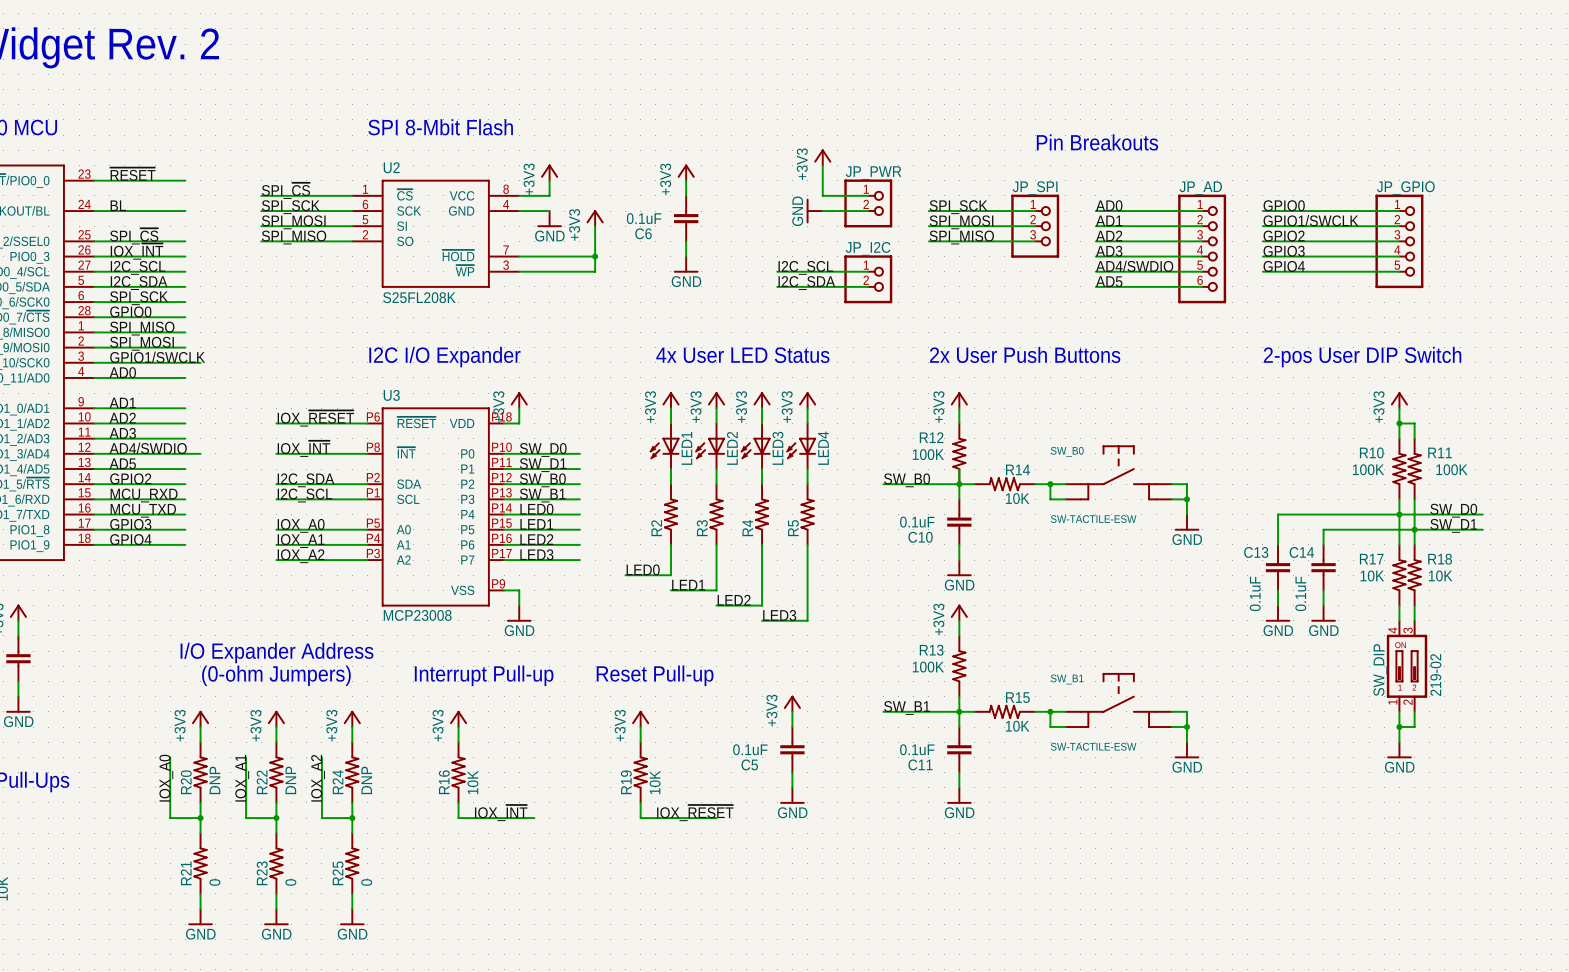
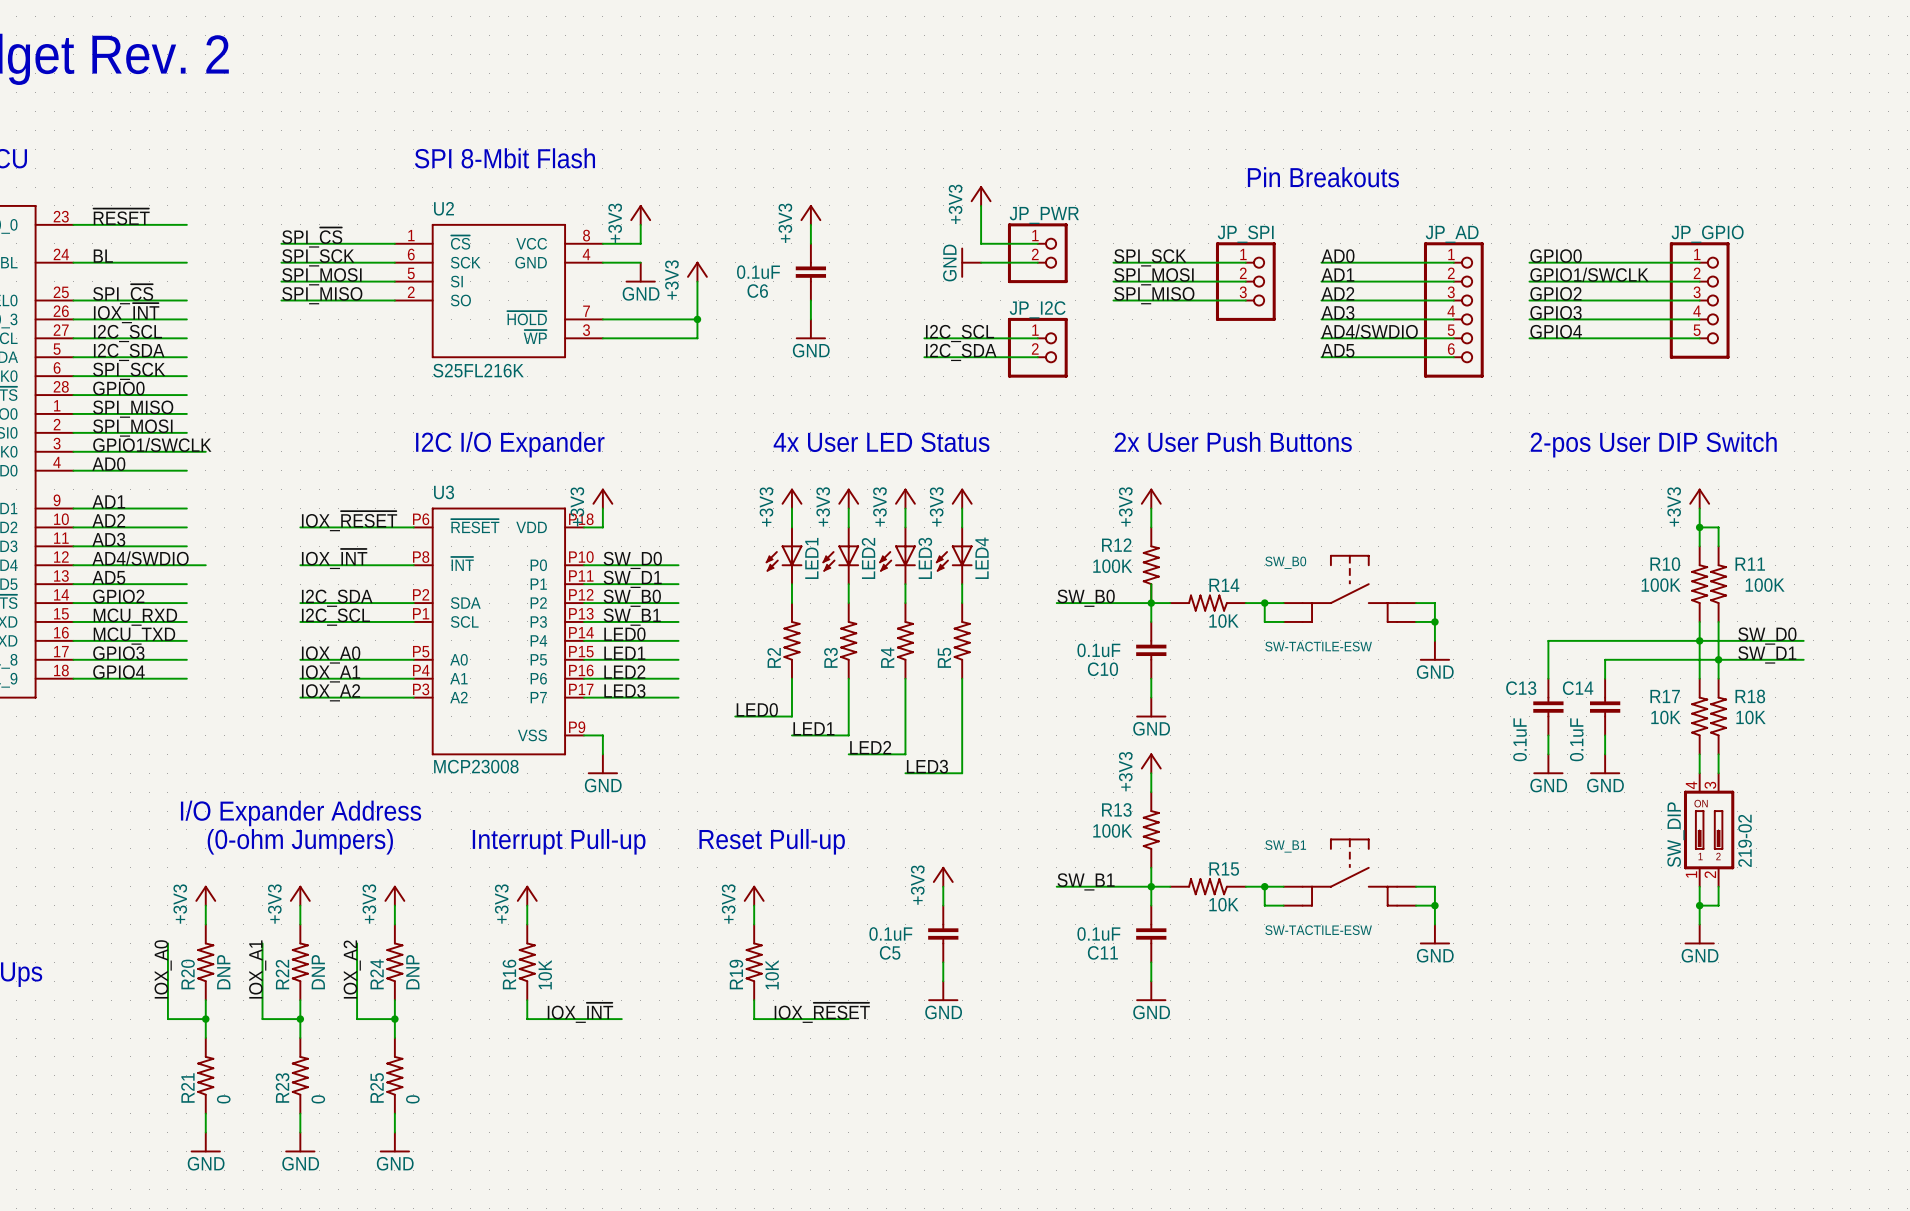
U2 value: S25FL208K (419, 297) -> S25FL216K (478, 370)

